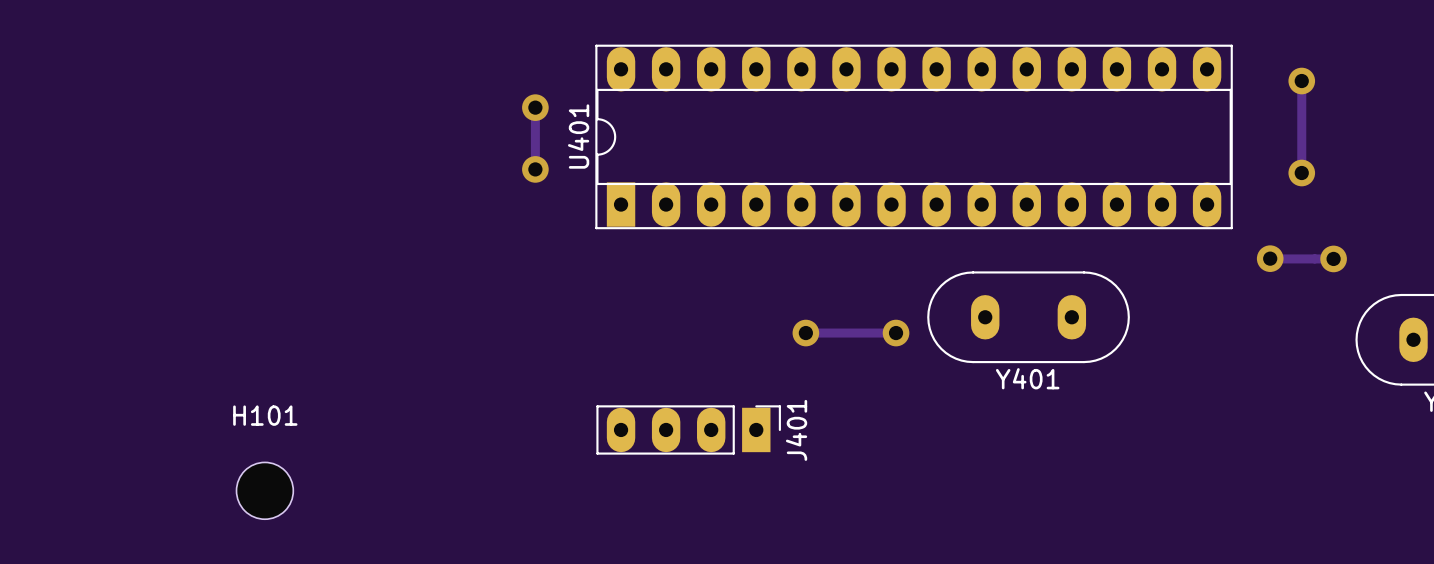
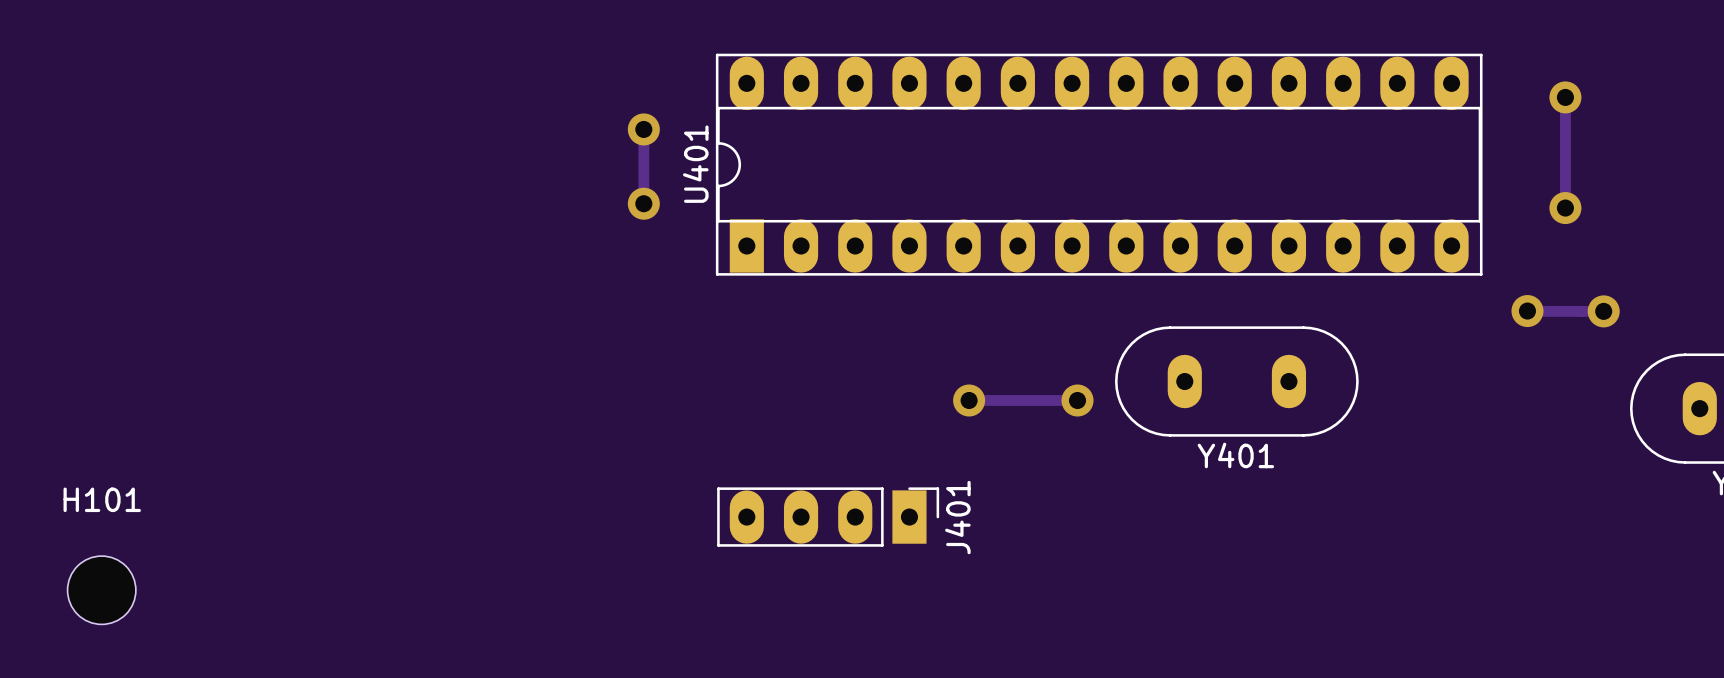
H101 position: (264, 490) -> (101, 590)

